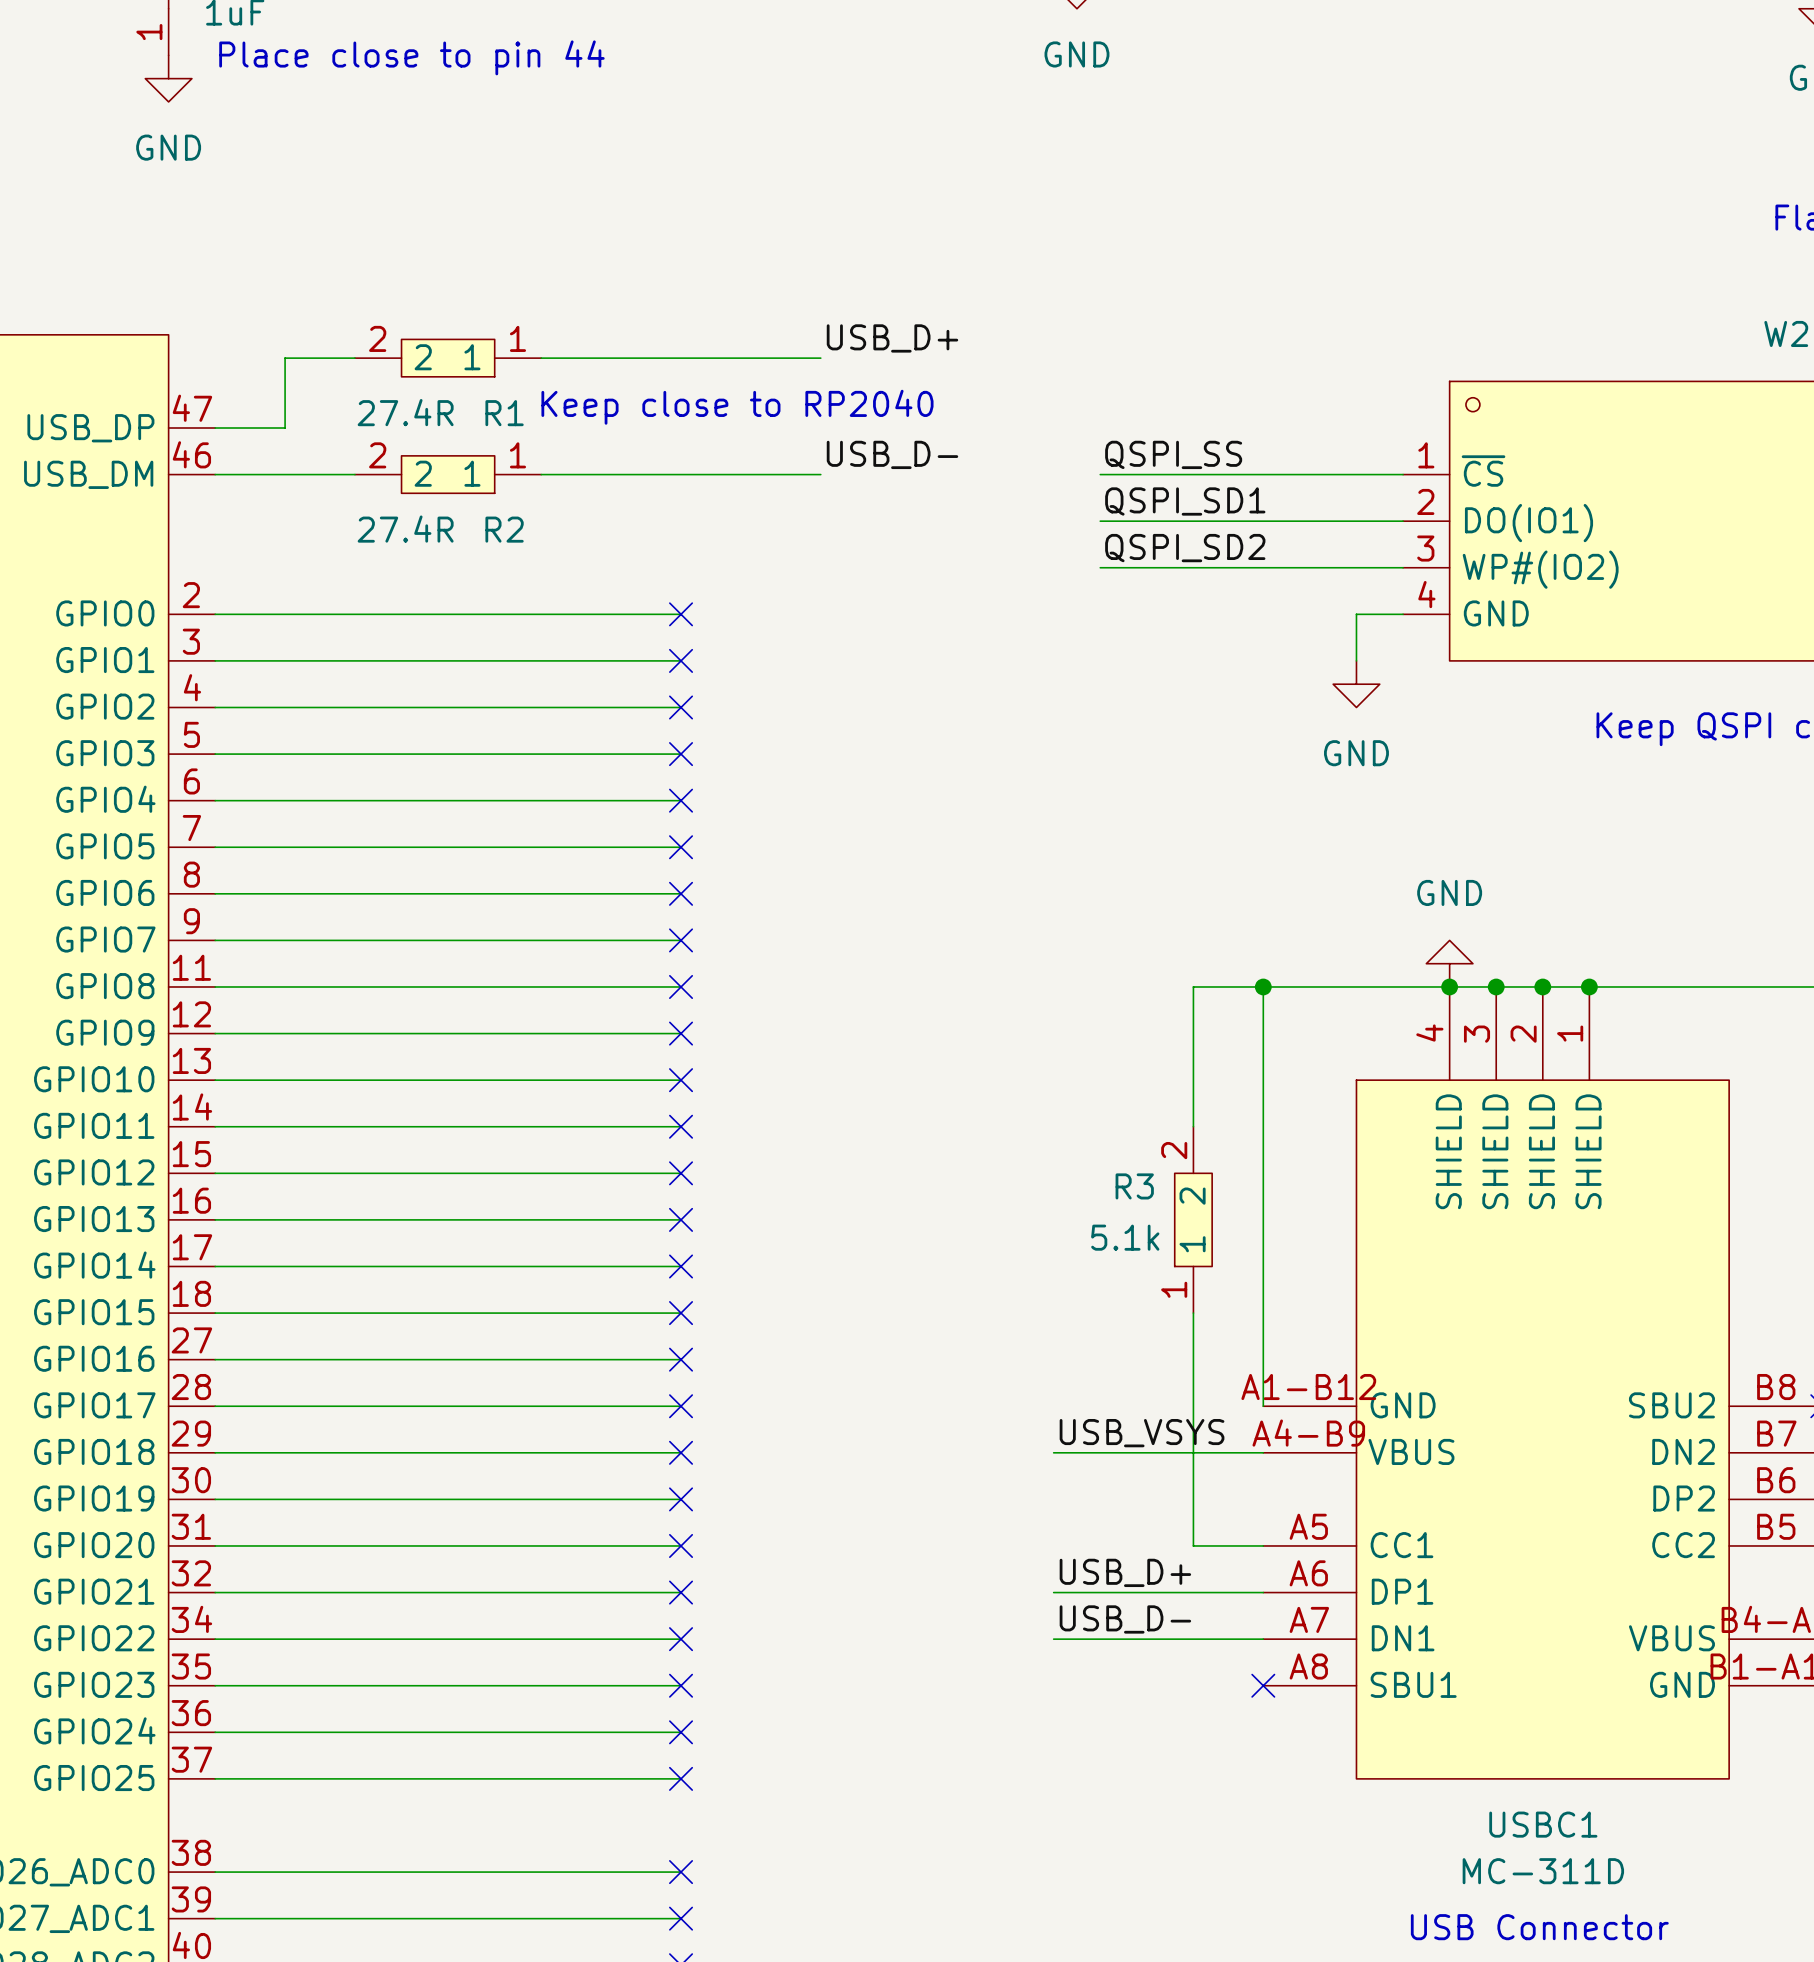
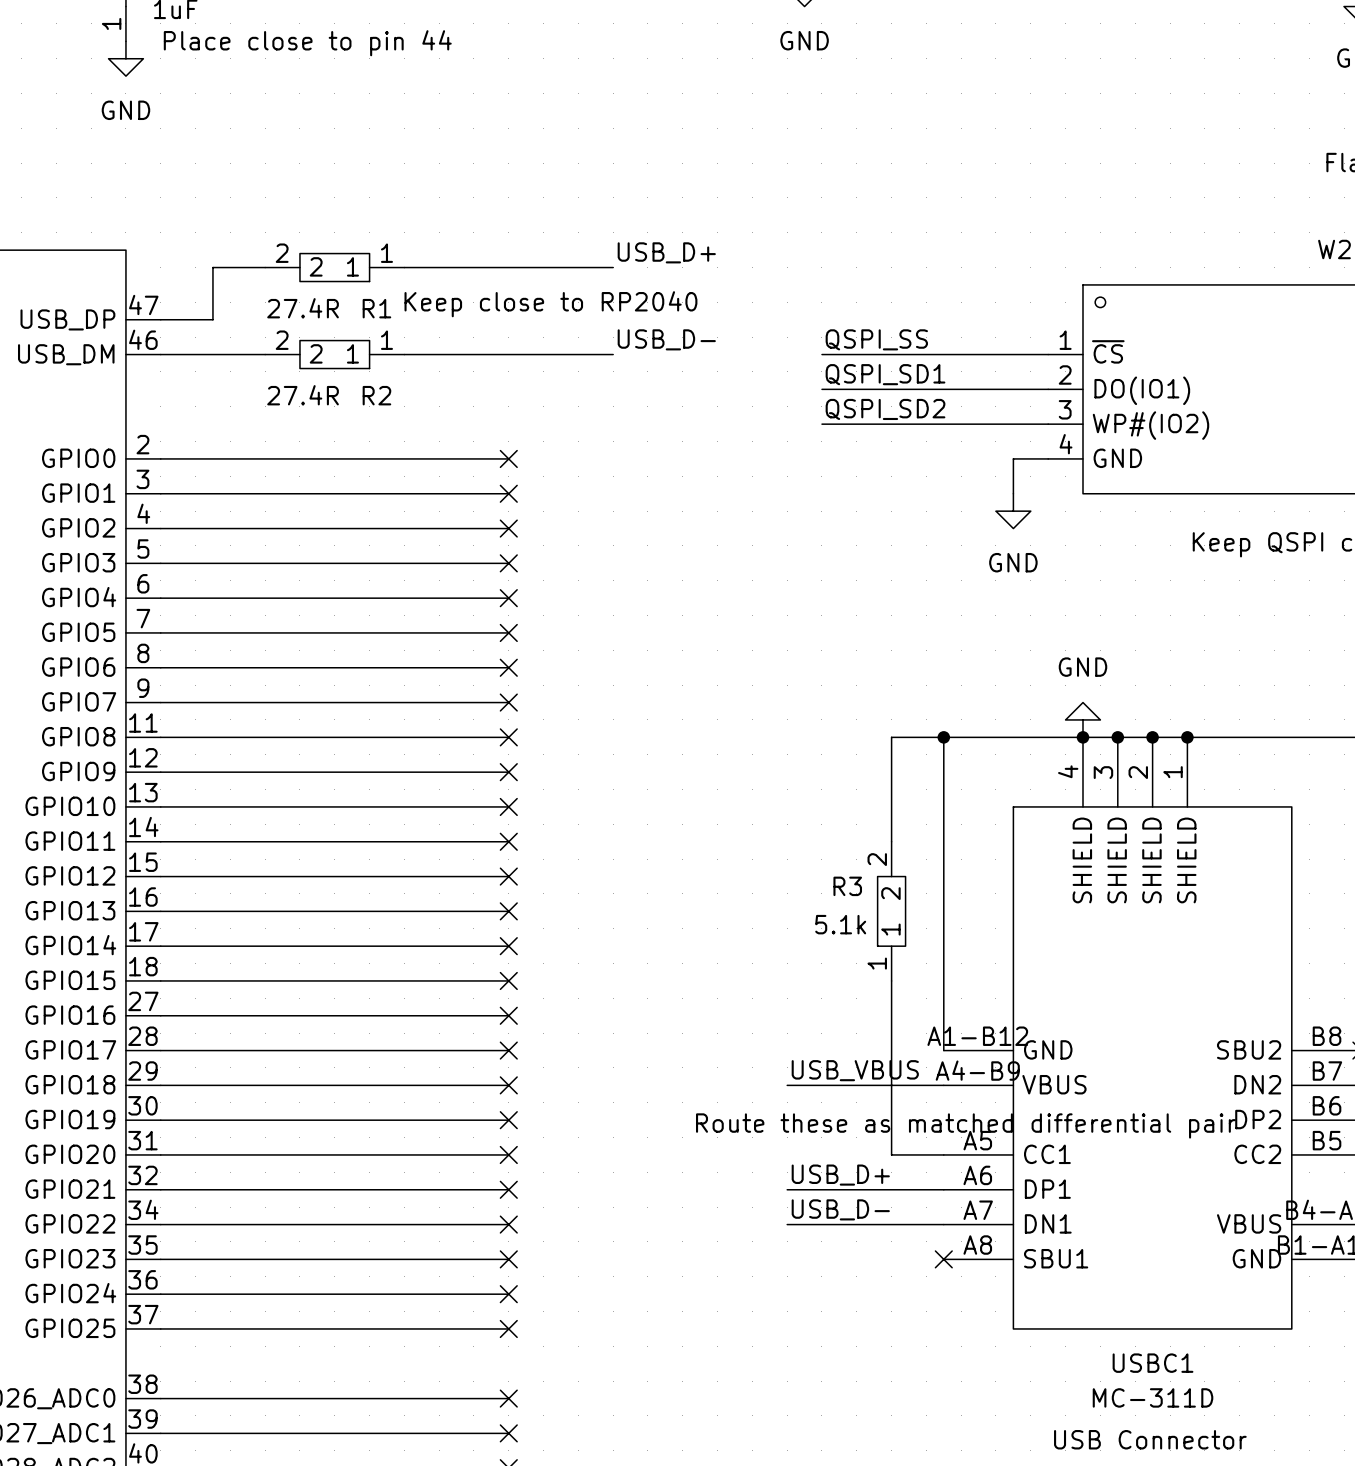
label: USB_VSYS (1142, 1433) -> USB_VBUS (855, 1070)
text: none -> Route these as matched differential pair (965, 1125)

